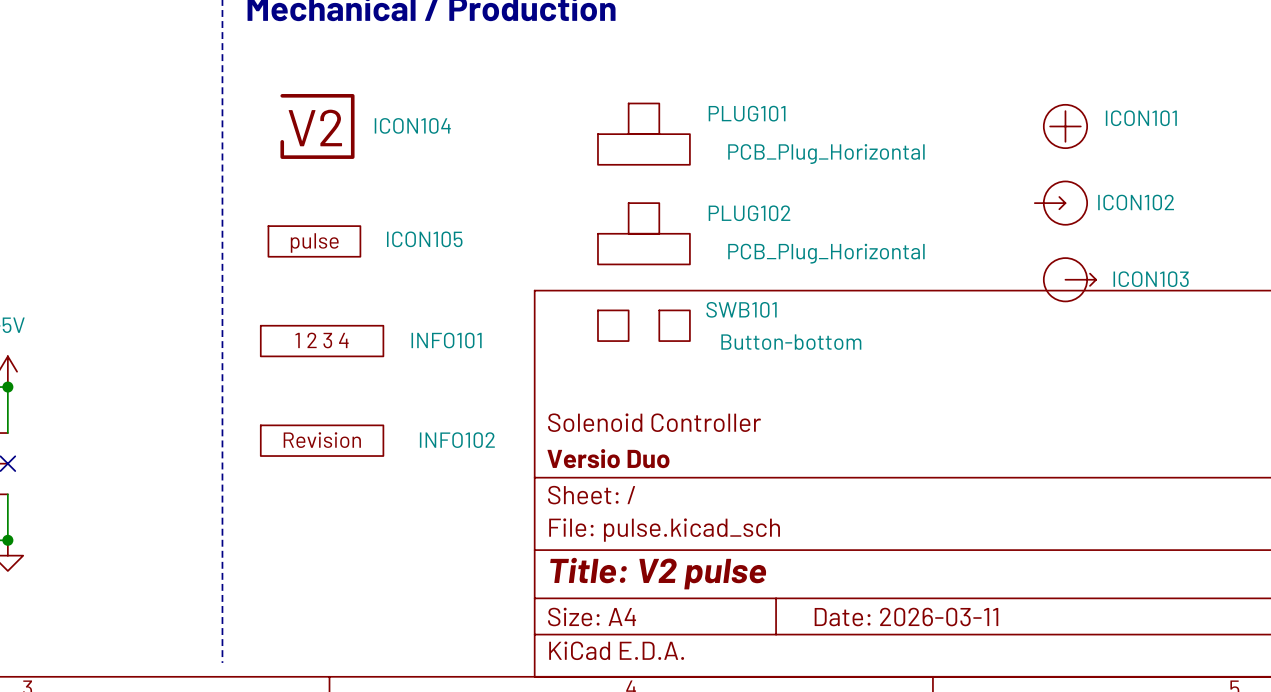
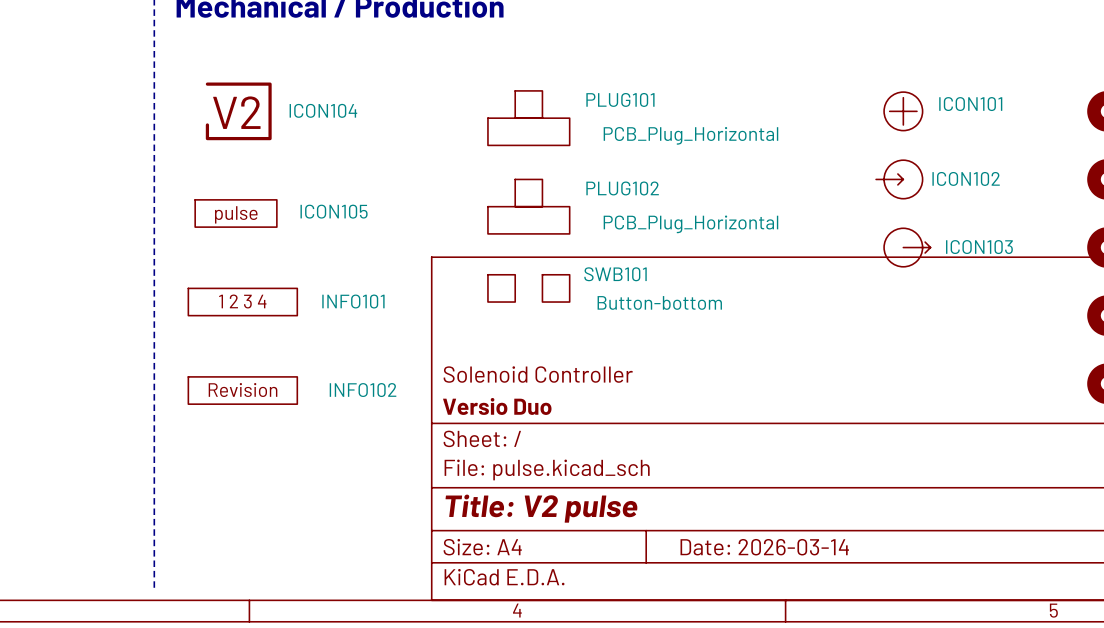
title block: Date: 2026-03-11 (906, 617) -> Date: 2026-03-14 (764, 547)

